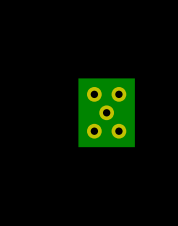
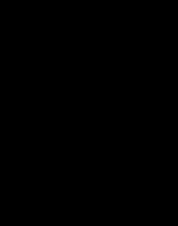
part: (106, 112) -> none

